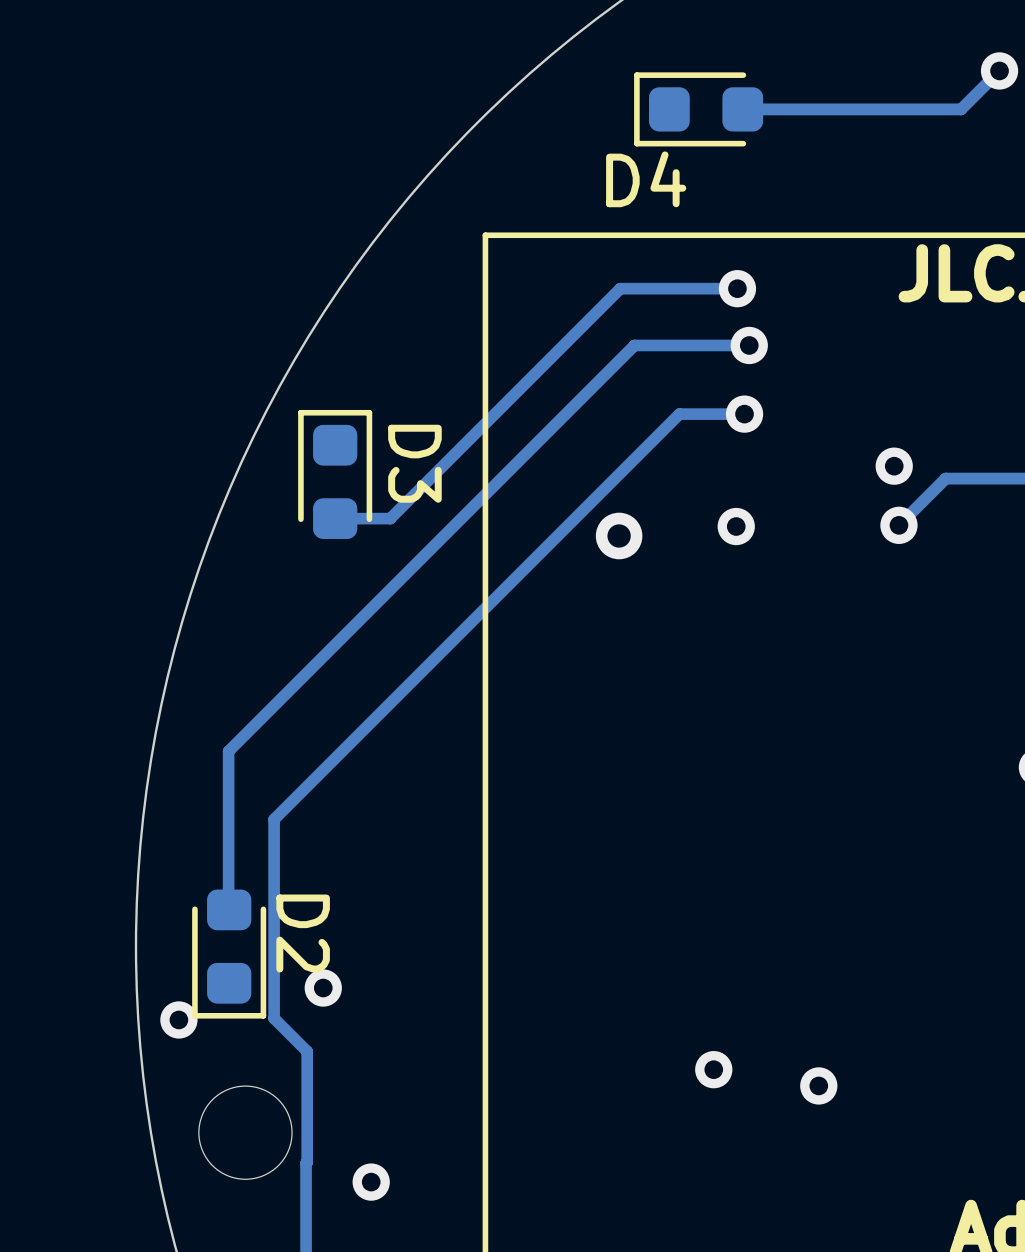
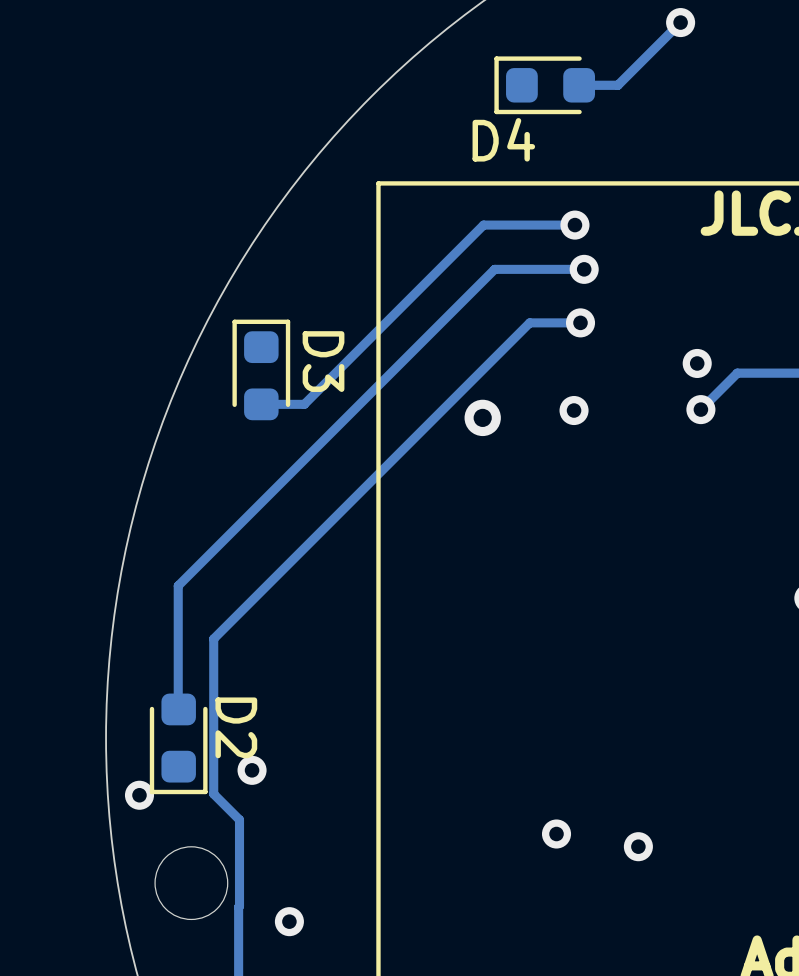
via: none -> (680, 22)
track: (999, 70) (961, 109) (792, 109) -> (680, 22) (617, 85)
via: (999, 70) -> none

